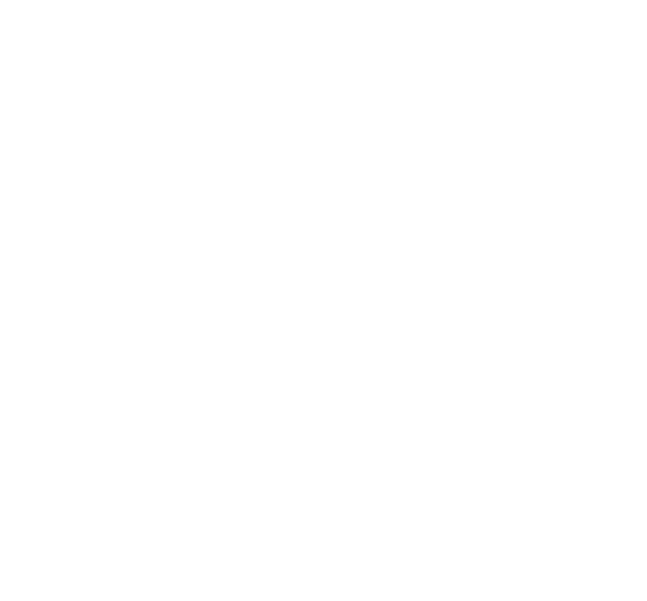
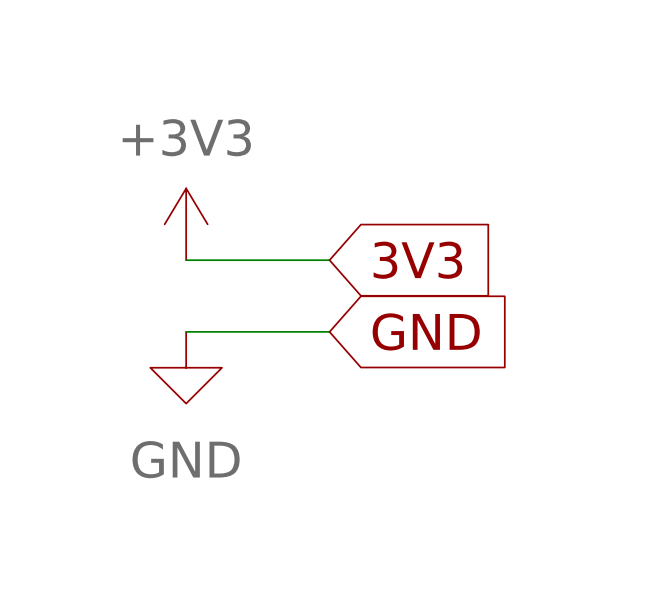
power symbol: none -> +3V3 (186, 224)
wire: none -> (186, 260) (329, 260)
global label: none -> 3V3 (417, 260)
wire: none -> (186, 331) (329, 331)
global label: none -> GND (426, 331)
power symbol: none -> GND (186, 367)

